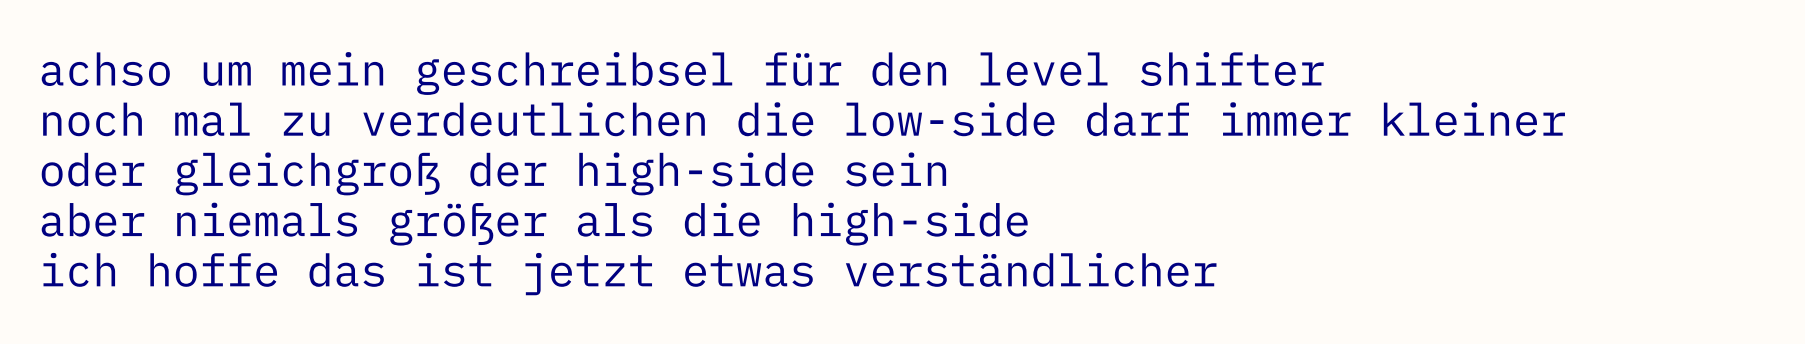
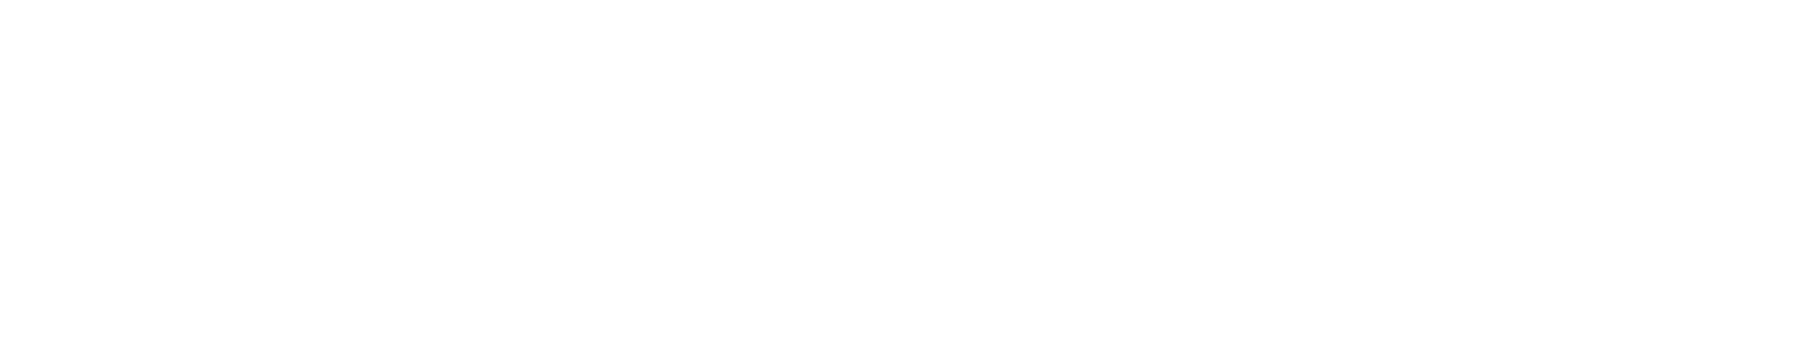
text: achso um mein geschreibsel für den level shifter (682, 73) -> none
text: noch mal zu verdeutlichen die low-side darf immer kleiner (804, 119) -> none
text: oder gleichgroß der high-side sein (493, 173) -> none
text: aber niemals größer als die high-side (534, 224) -> none
text: ich hoffe das ist jetzt etwas verständlicher (629, 274) -> none

